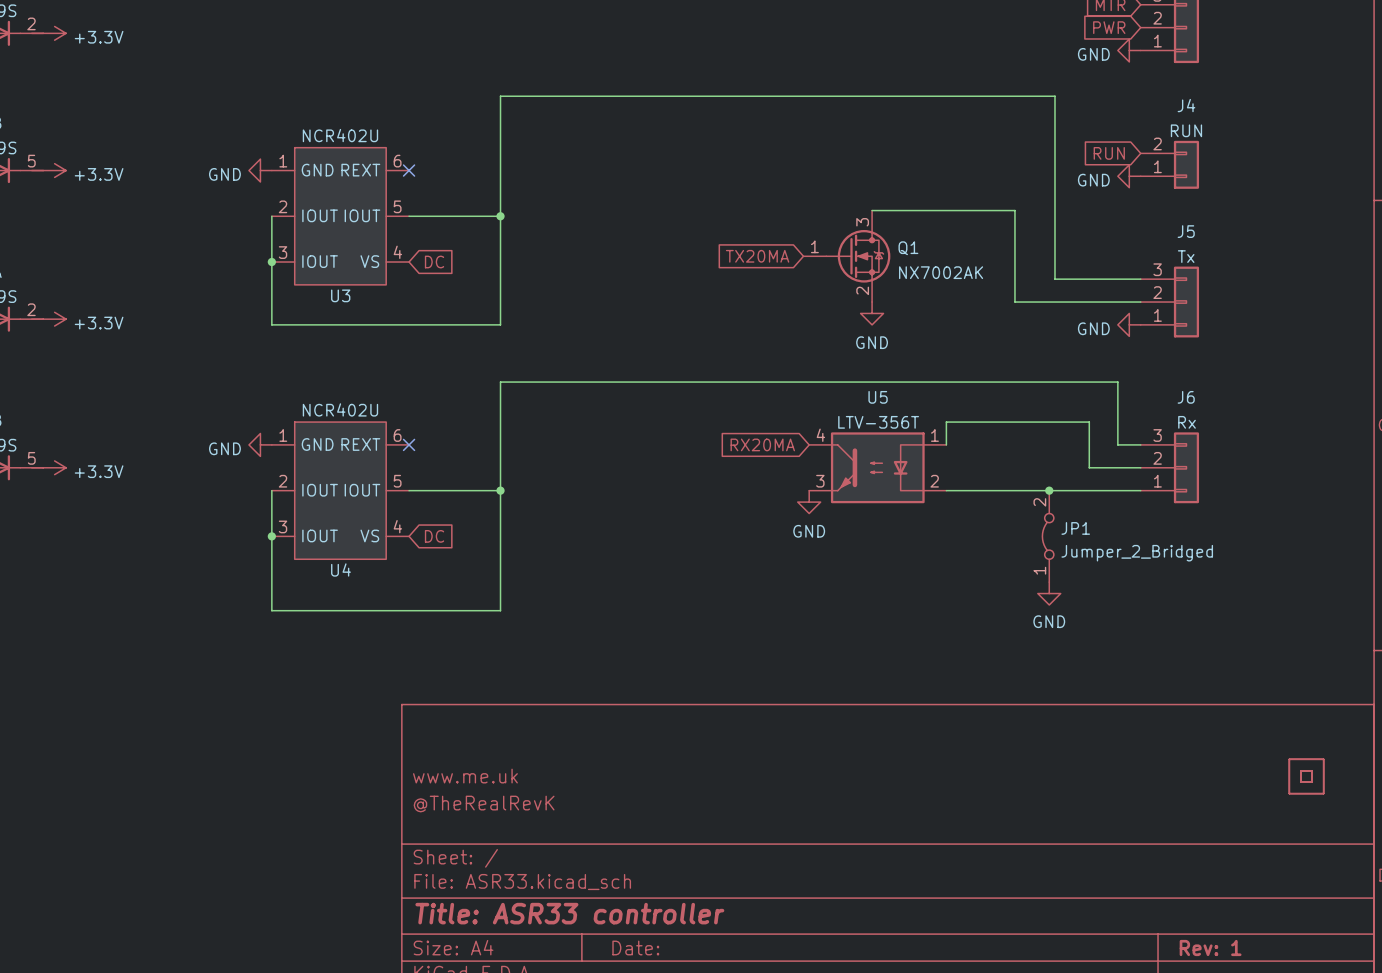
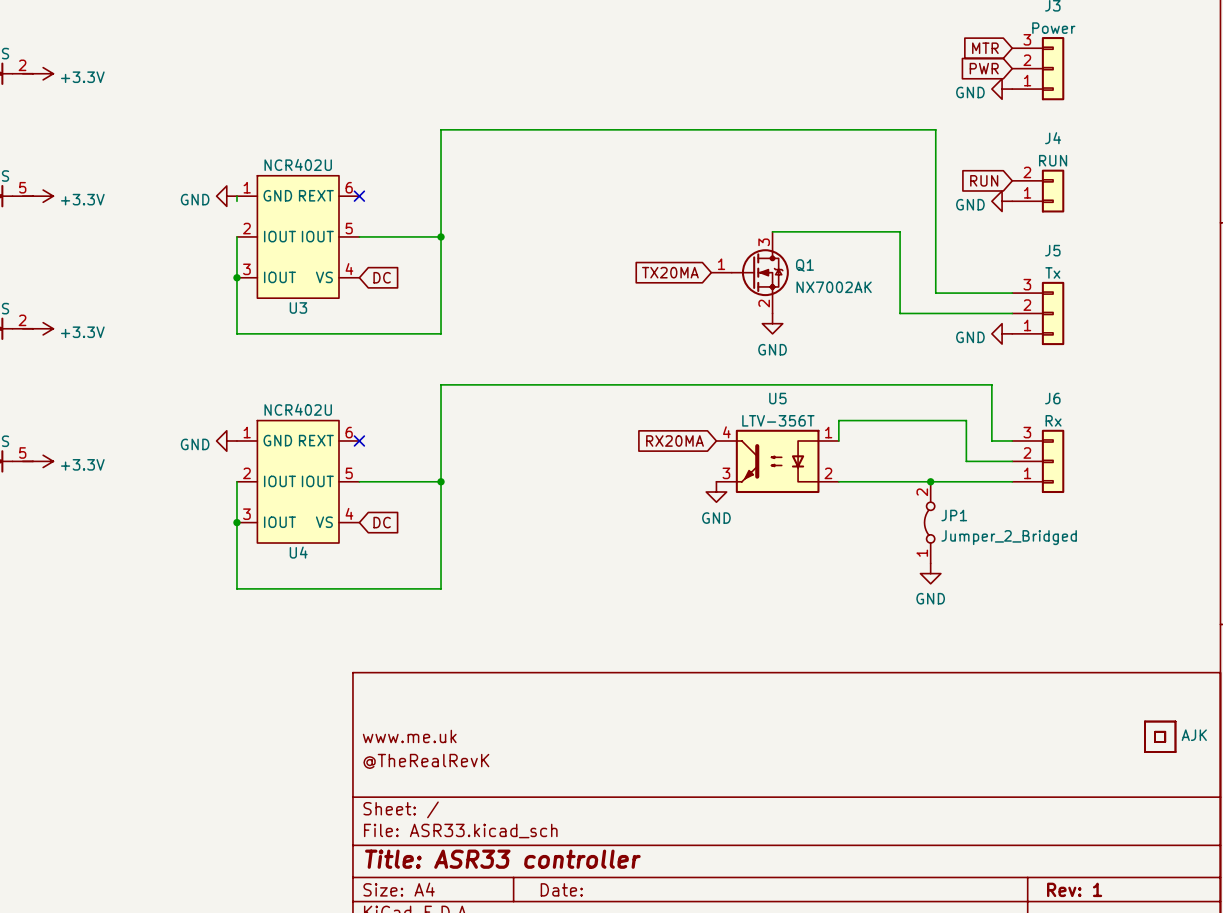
wire: none -> (236, 196) (236, 201)
part: none -> AJK (1194, 735)

